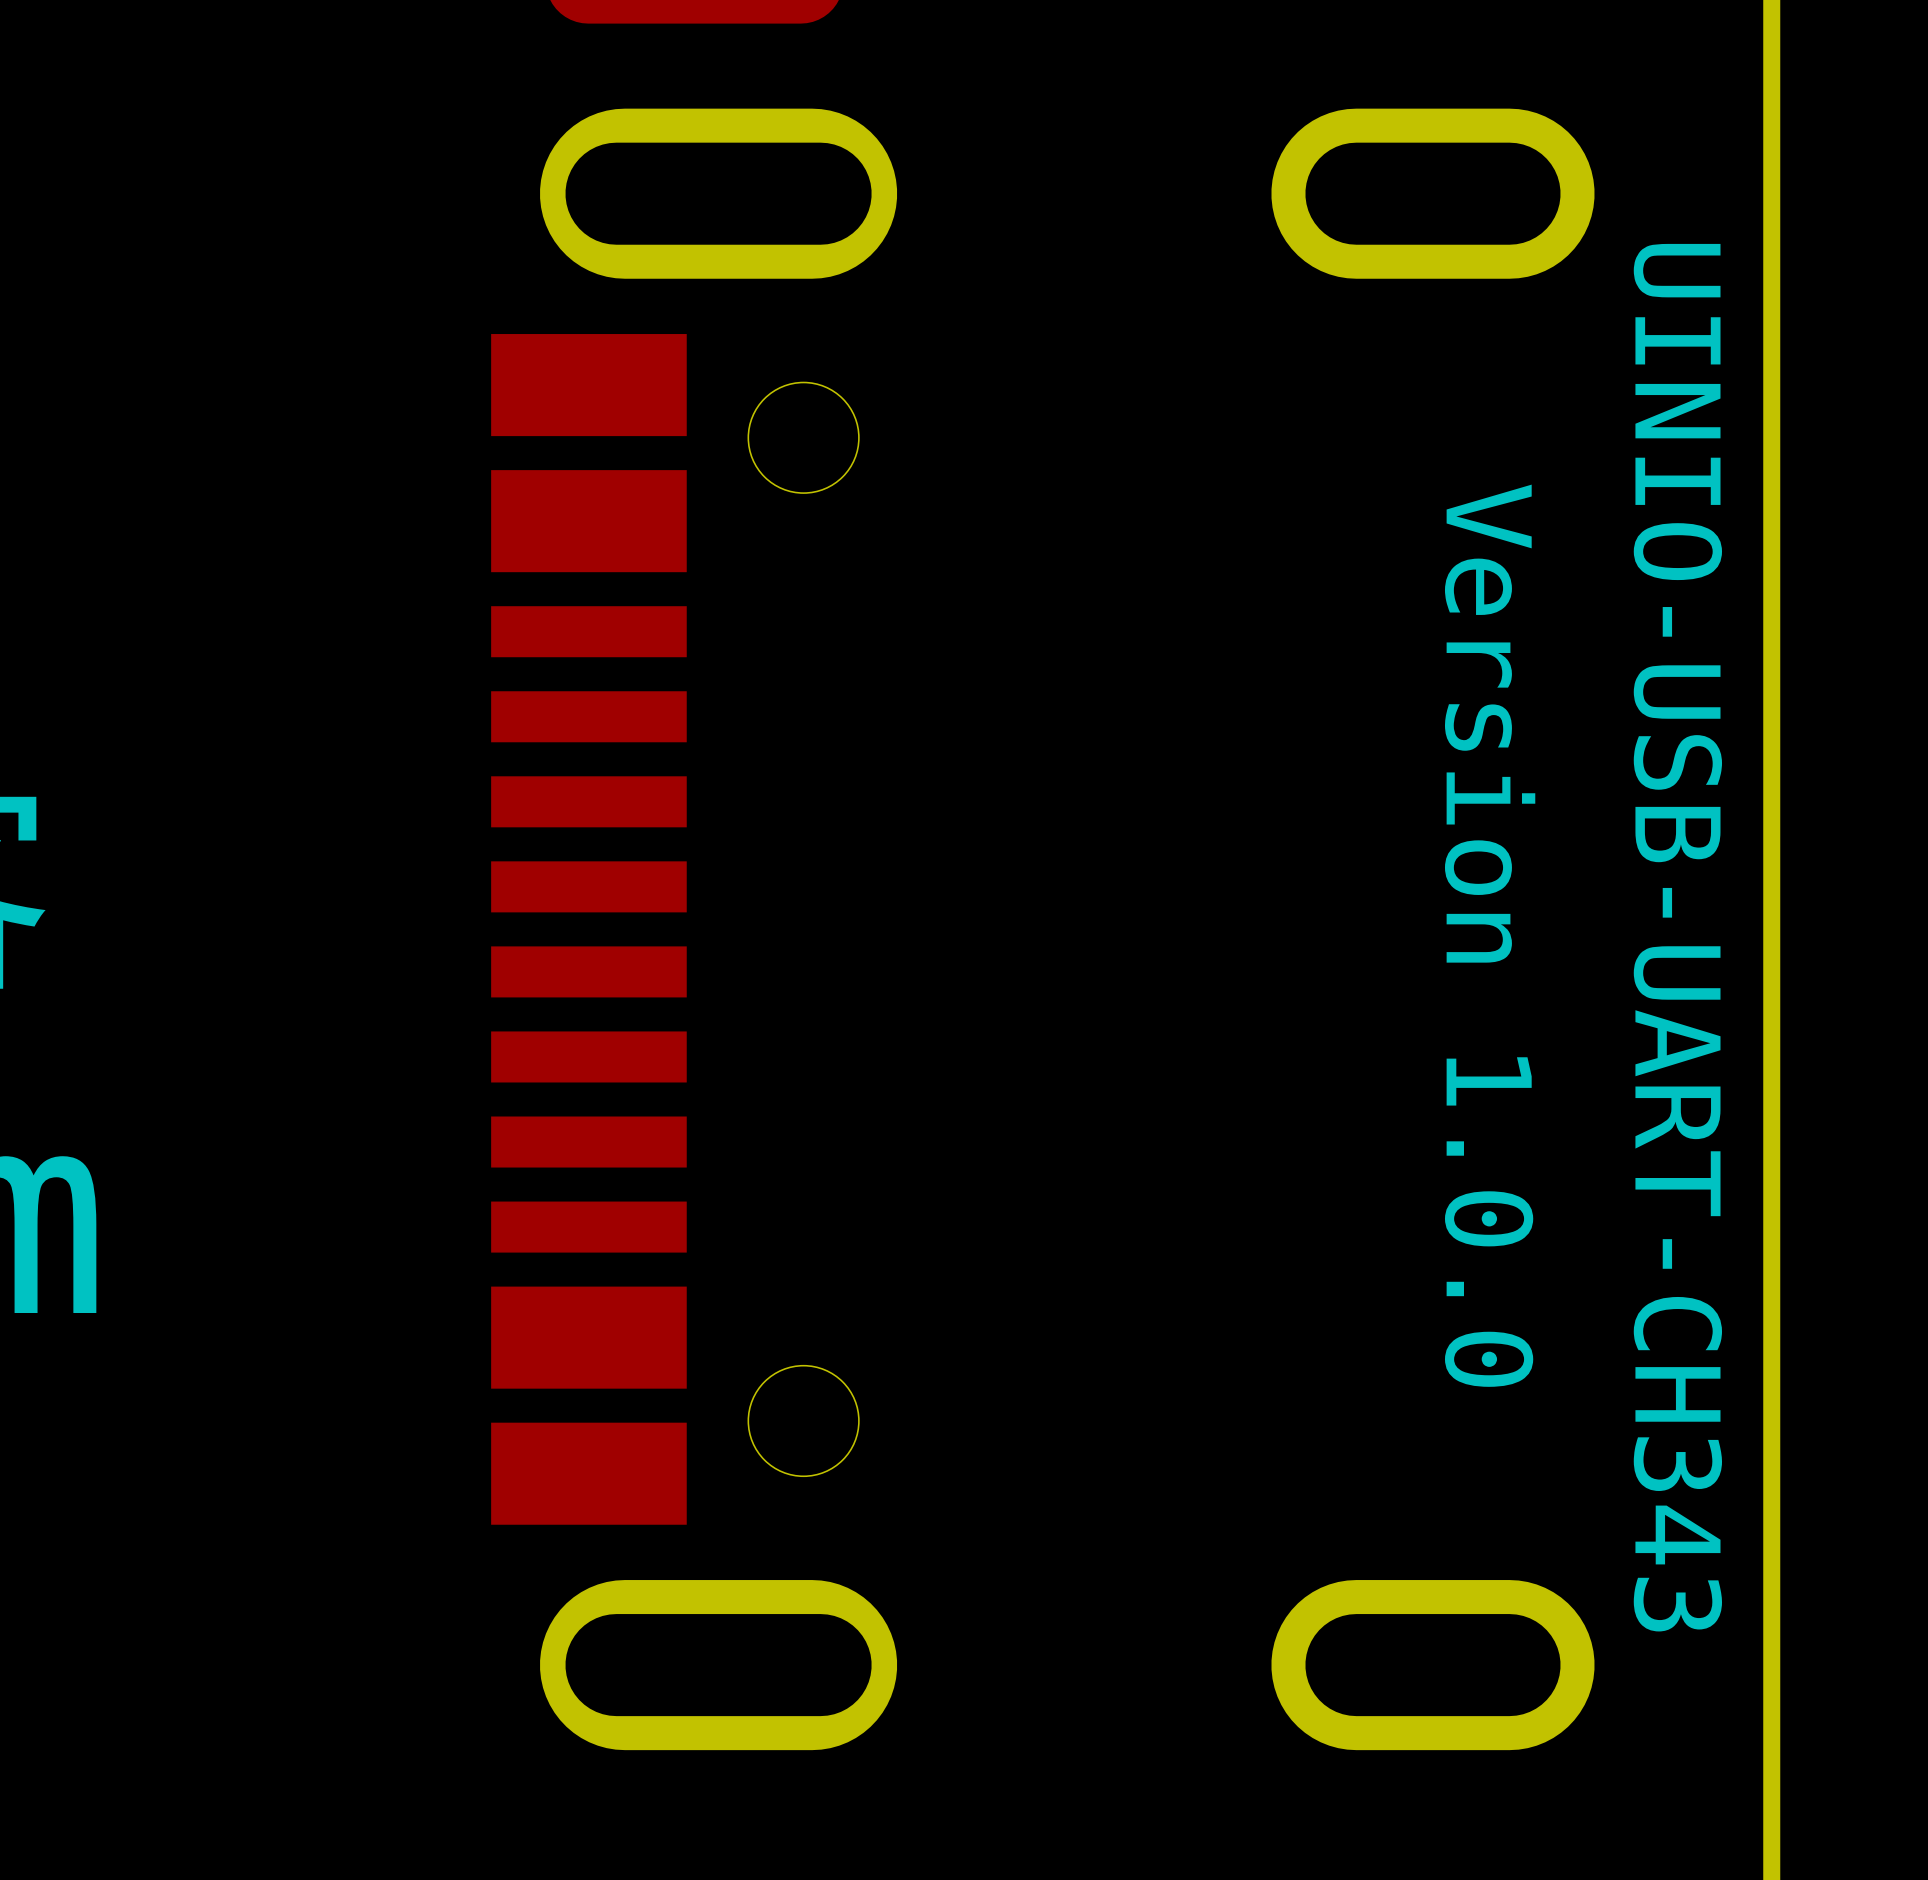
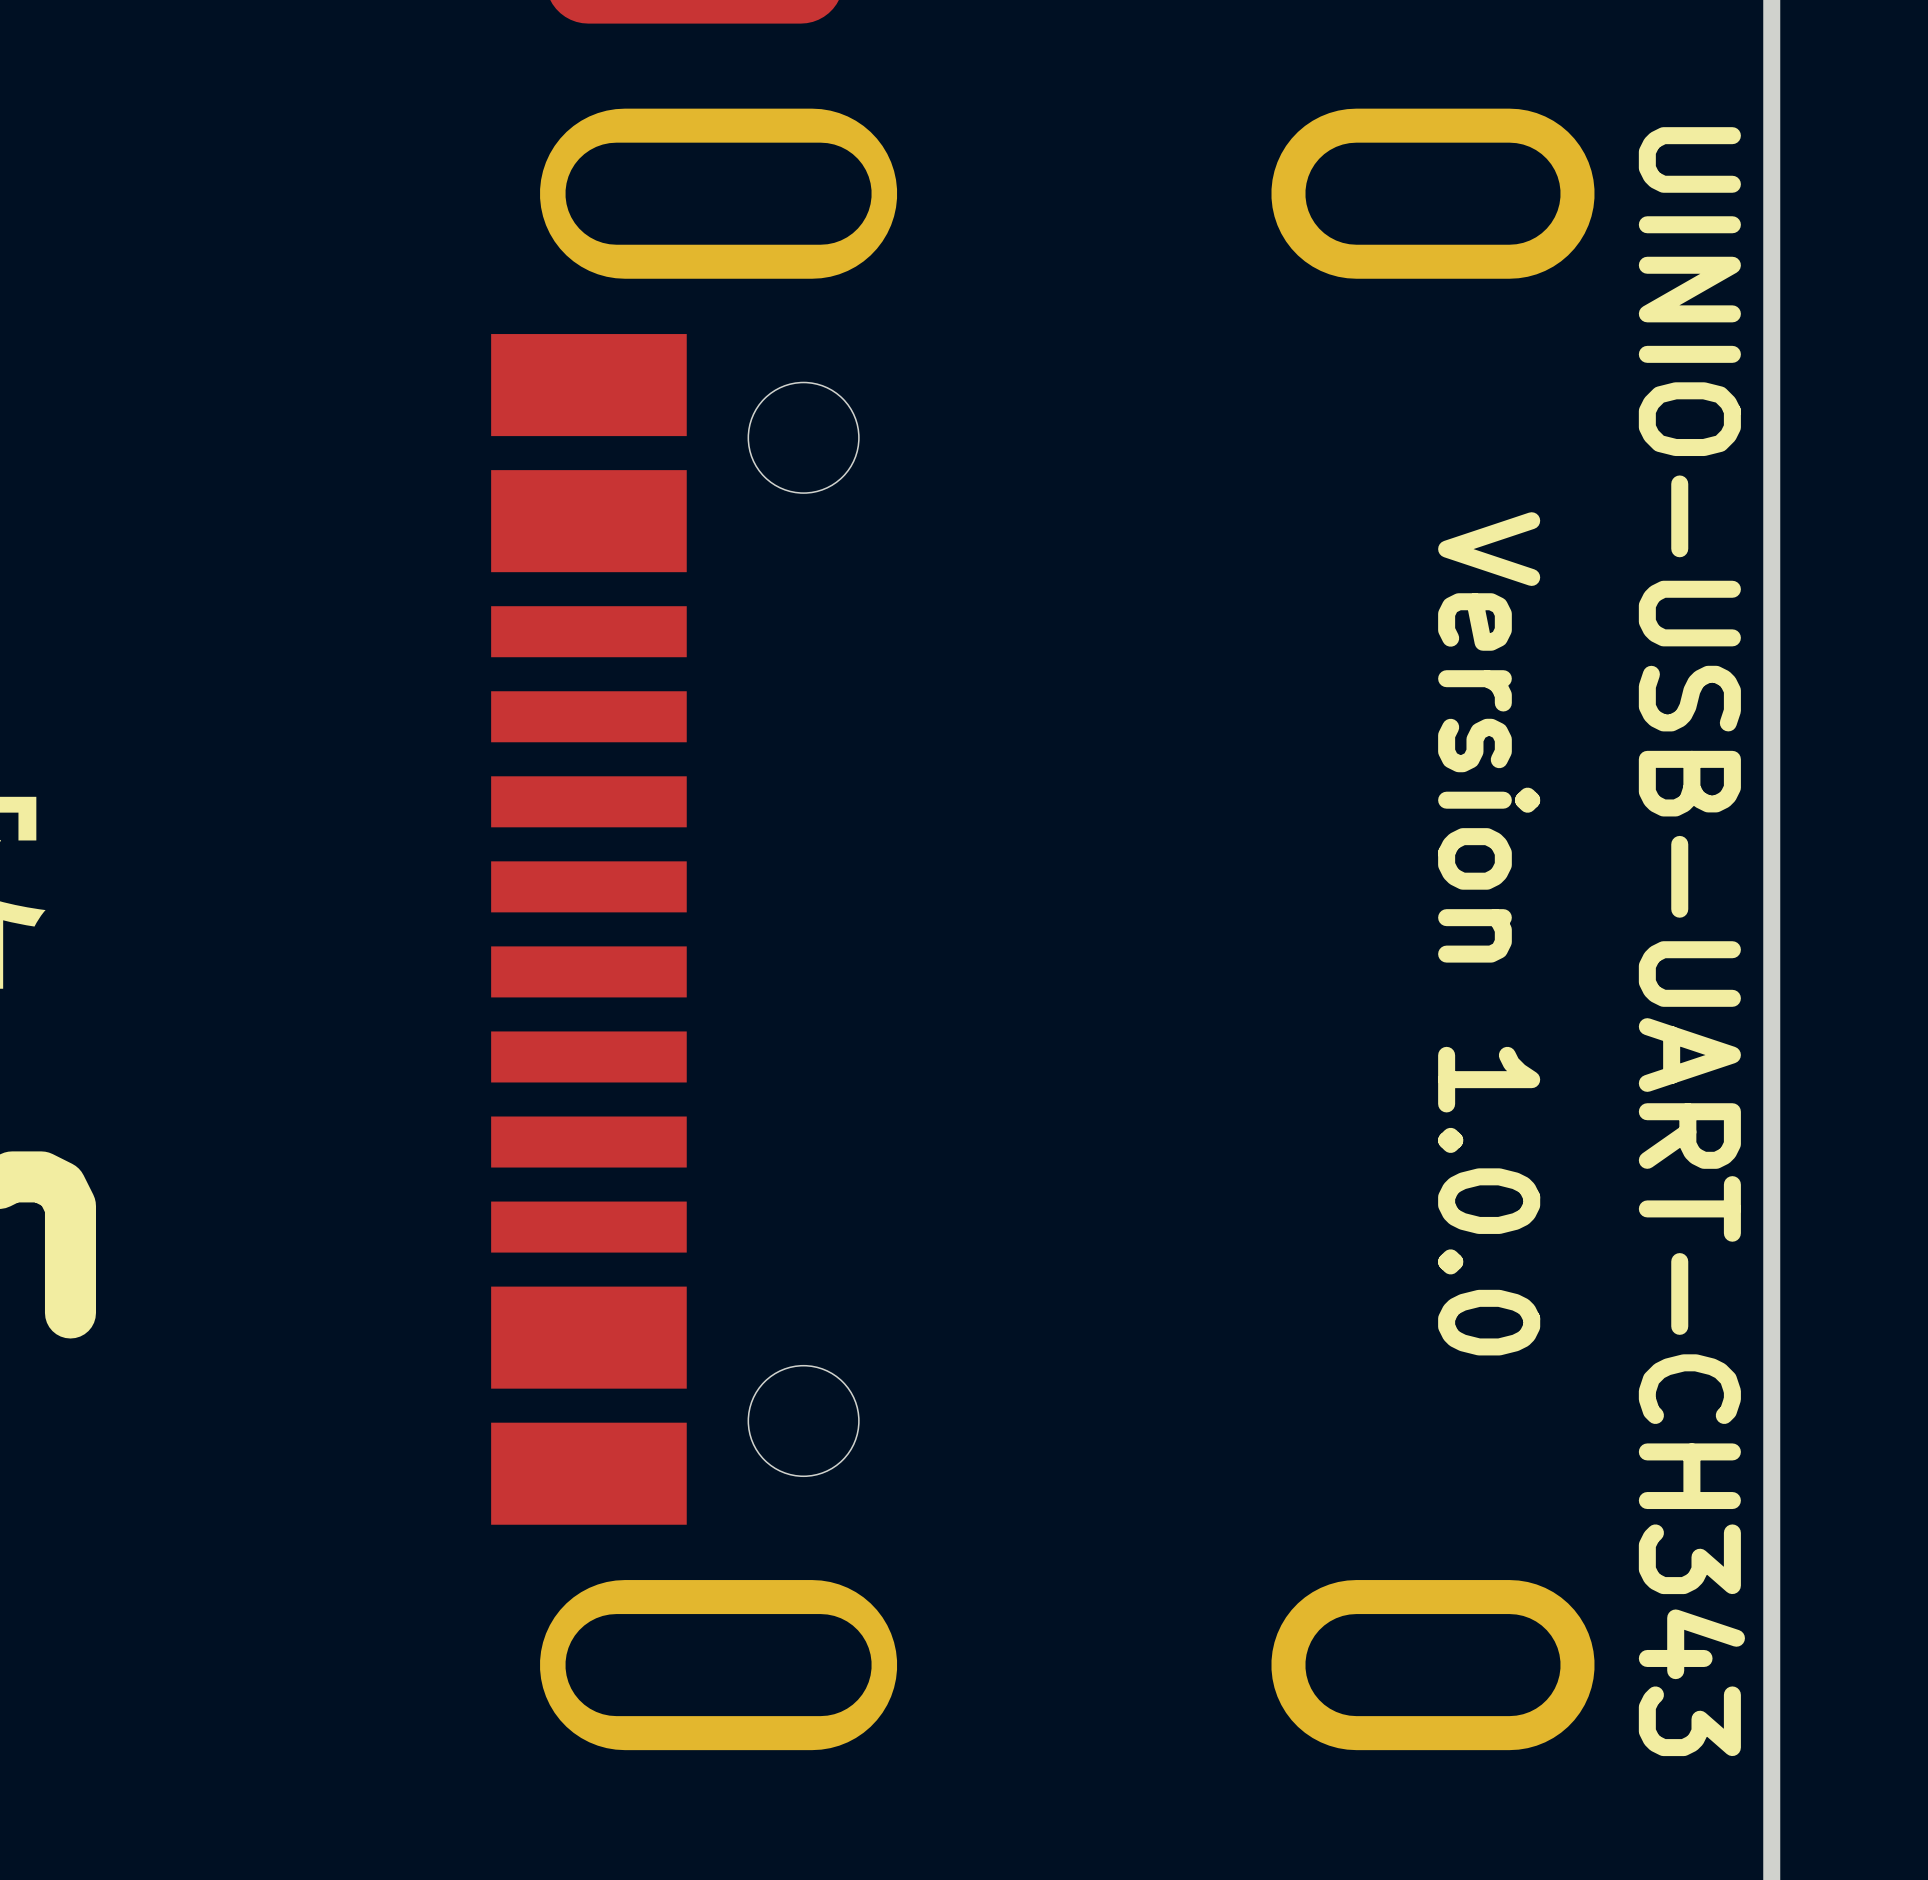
text position: UINIO-USB-UART-CH343 (1677, 937) -> UINIO-USB-UART-CH343 (1691, 941)

